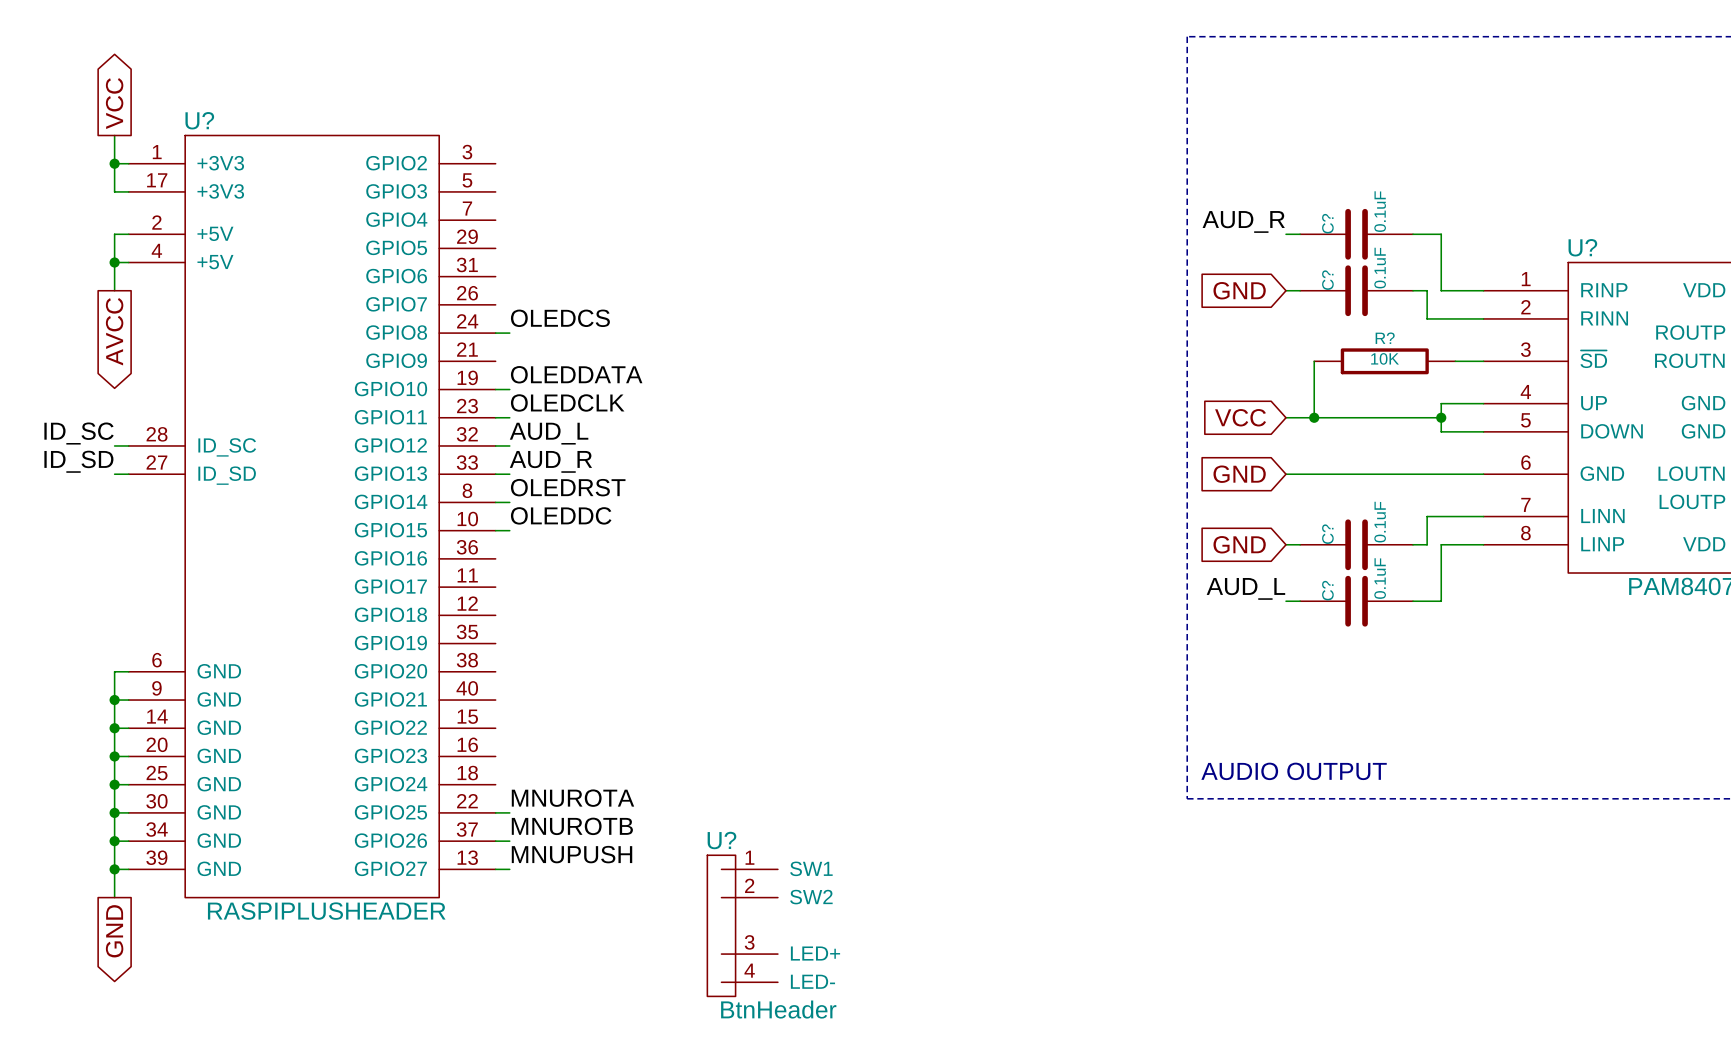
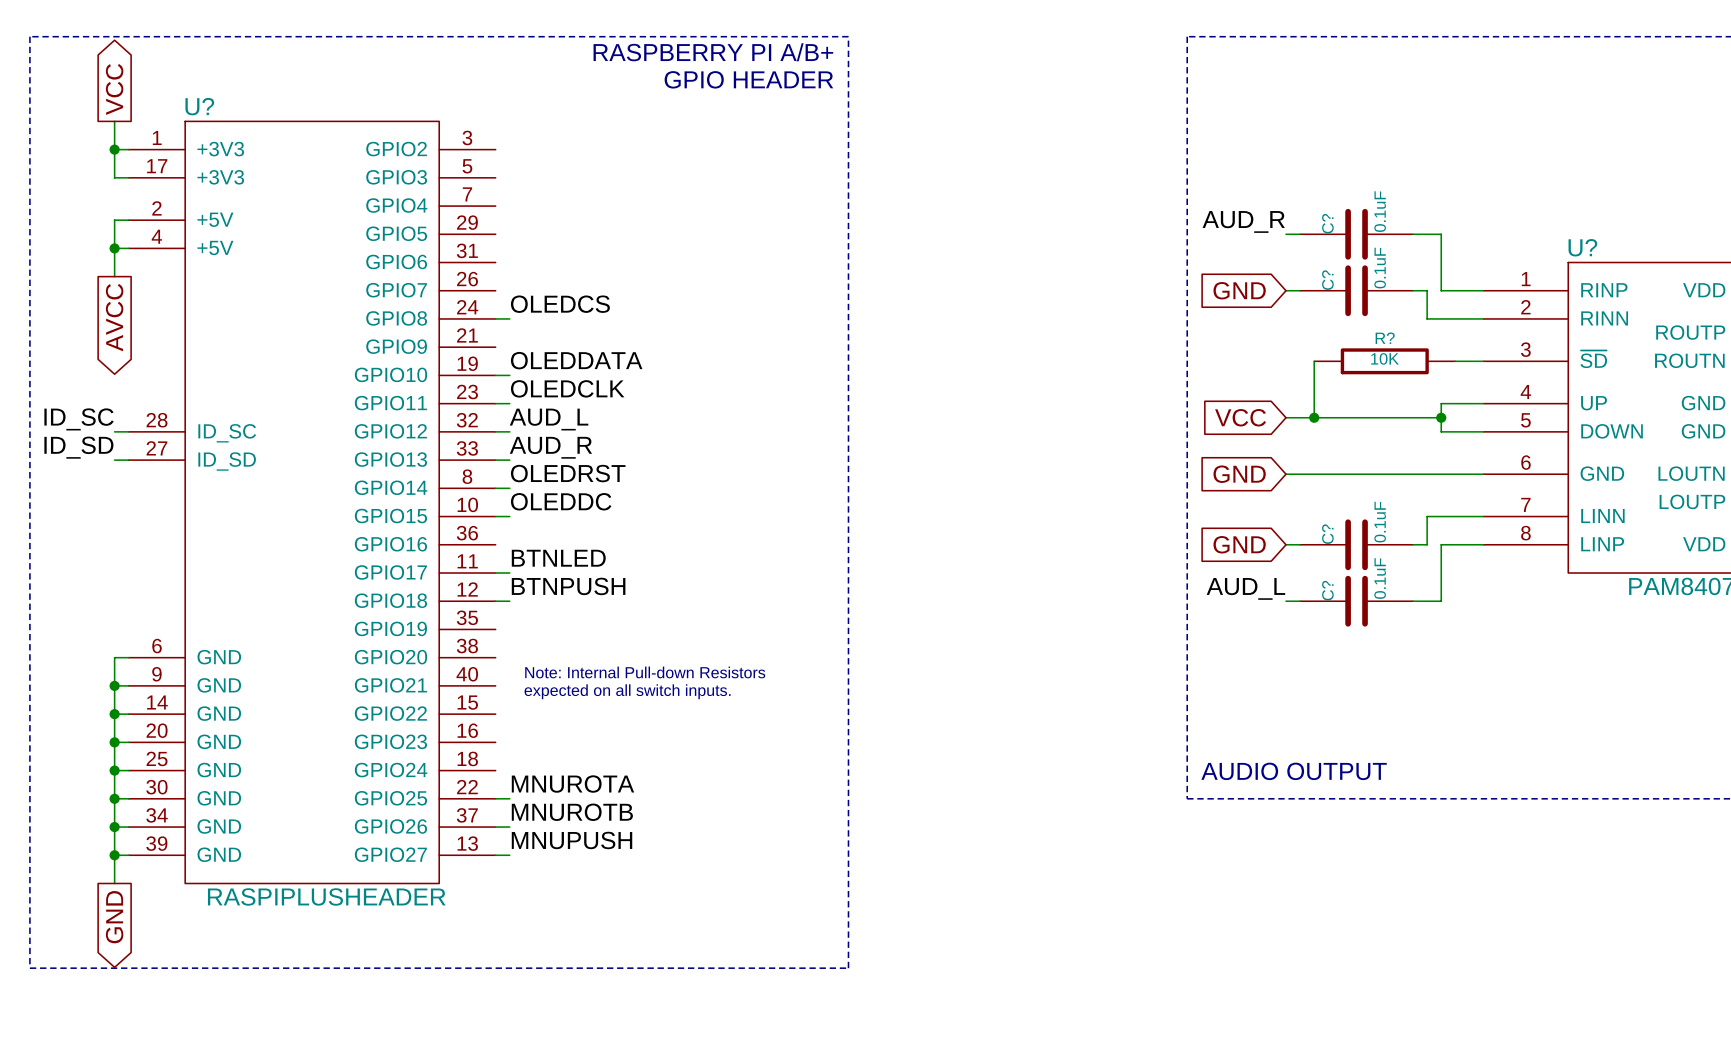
line: none -> (29, 36) (29, 968) (848, 968) (848, 36) (29, 36)
text: none -> RASPBERRY PI A/B+ (713, 52)
text: none -> GPIO HEADER (748, 79)
global label position: VCC (114, 103) -> VCC (114, 89)
wire: (114, 163) (128, 163) -> (114, 149) (128, 149)
junction position: (114, 163) -> (114, 149)
wire: (114, 177) (114, 191) (128, 191) -> (114, 177) (128, 177)
wire: (114, 234) (128, 234) -> (114, 234) (114, 220) (128, 220)
wire: (114, 262) (128, 262) -> (114, 248) (128, 248)
junction position: (114, 262) -> (114, 248)
wire: (114, 276) (114, 290) -> (114, 121) (114, 135)
label position: OLEDCS (560, 318) -> OLEDCS (560, 304)
global label position: AVCC (114, 331) -> AVCC (114, 317)
wire: (495, 333) (509, 333) -> (495, 318) (509, 318)
label position: OLEDDATA (576, 374) -> OLEDDATA (576, 360)
wire: (495, 389) (509, 389) -> (495, 375) (509, 375)
label position: OLEDCLK (567, 402) -> OLEDCLK (567, 388)
wire: (495, 417) (509, 417) -> (495, 403) (509, 403)
label position: ID_SC (79, 433) -> ID_SC (79, 419)
label position: AUD_L (549, 433) -> AUD_L (549, 419)
wire: (114, 445) (128, 445) -> (114, 431) (128, 431)
wire: (495, 445) (509, 445) -> (495, 431) (509, 431)
label position: ID_SD (78, 461) -> ID_SD (78, 447)
label position: AUD_R (550, 461) -> AUD_R (550, 447)
wire: (114, 474) (128, 474) -> (114, 460) (128, 460)
wire: (495, 474) (509, 474) -> (495, 460) (509, 460)
label position: OLEDRST (568, 487) -> OLEDRST (568, 473)
wire: (495, 502) (509, 502) -> (495, 488) (509, 488)
label position: OLEDDC (561, 515) -> OLEDDC (561, 501)
U? position: (312, 516) -> (312, 502)
wire: (495, 530) (509, 530) -> (495, 516) (509, 516)
label: none -> BTNLED (558, 558)
wire: none -> (495, 573) (509, 573)
label: none -> BTNPUSH (568, 586)
wire: none -> (495, 601) (509, 601)
wire: (114, 671) (128, 671) -> (114, 671) (114, 657) (128, 657)
text: none -> Note: Internal Pull-down Resistors (645, 672)
junction: none -> (114, 685)
text: none -> expected on all switch inputs. (627, 691)
wire: (114, 700) (128, 700) -> (114, 685) (128, 685)
junction: (114, 700) -> none
junction: none -> (114, 714)
wire: (114, 728) (128, 728) -> (114, 714) (128, 714)
junction: (114, 728) -> none
junction: none -> (114, 742)
wire: (114, 756) (128, 756) -> (114, 742) (128, 742)
junction: (114, 756) -> none
junction: none -> (114, 770)
wire: (114, 784) (128, 784) -> (114, 770) (128, 770)
junction: (114, 784) -> none
junction: none -> (114, 798)
label position: MNUROTA (572, 798) -> MNUROTA (572, 784)
wire: (114, 812) (128, 812) -> (114, 798) (128, 798)
junction: (114, 812) -> none
wire: (495, 812) (509, 812) -> (495, 798) (509, 798)
label position: MNUROTB (572, 826) -> MNUROTB (572, 812)
junction: none -> (114, 827)
wire: (114, 841) (128, 841) -> (114, 827) (128, 827)
junction: (114, 841) -> none
wire: (495, 841) (509, 841) -> (495, 827) (509, 827)
label position: MNUPUSH (572, 854) -> MNUPUSH (572, 840)
junction: none -> (114, 855)
wire: (114, 869) (128, 869) -> (114, 855) (128, 855)
junction: (114, 869) -> none
wire: (495, 869) (509, 869) -> (495, 855) (509, 855)
wire: (114, 883) (114, 897) -> none
U?: BtnHeader (742, 925) -> none
global label position: GND (114, 931) -> GND (114, 917)

